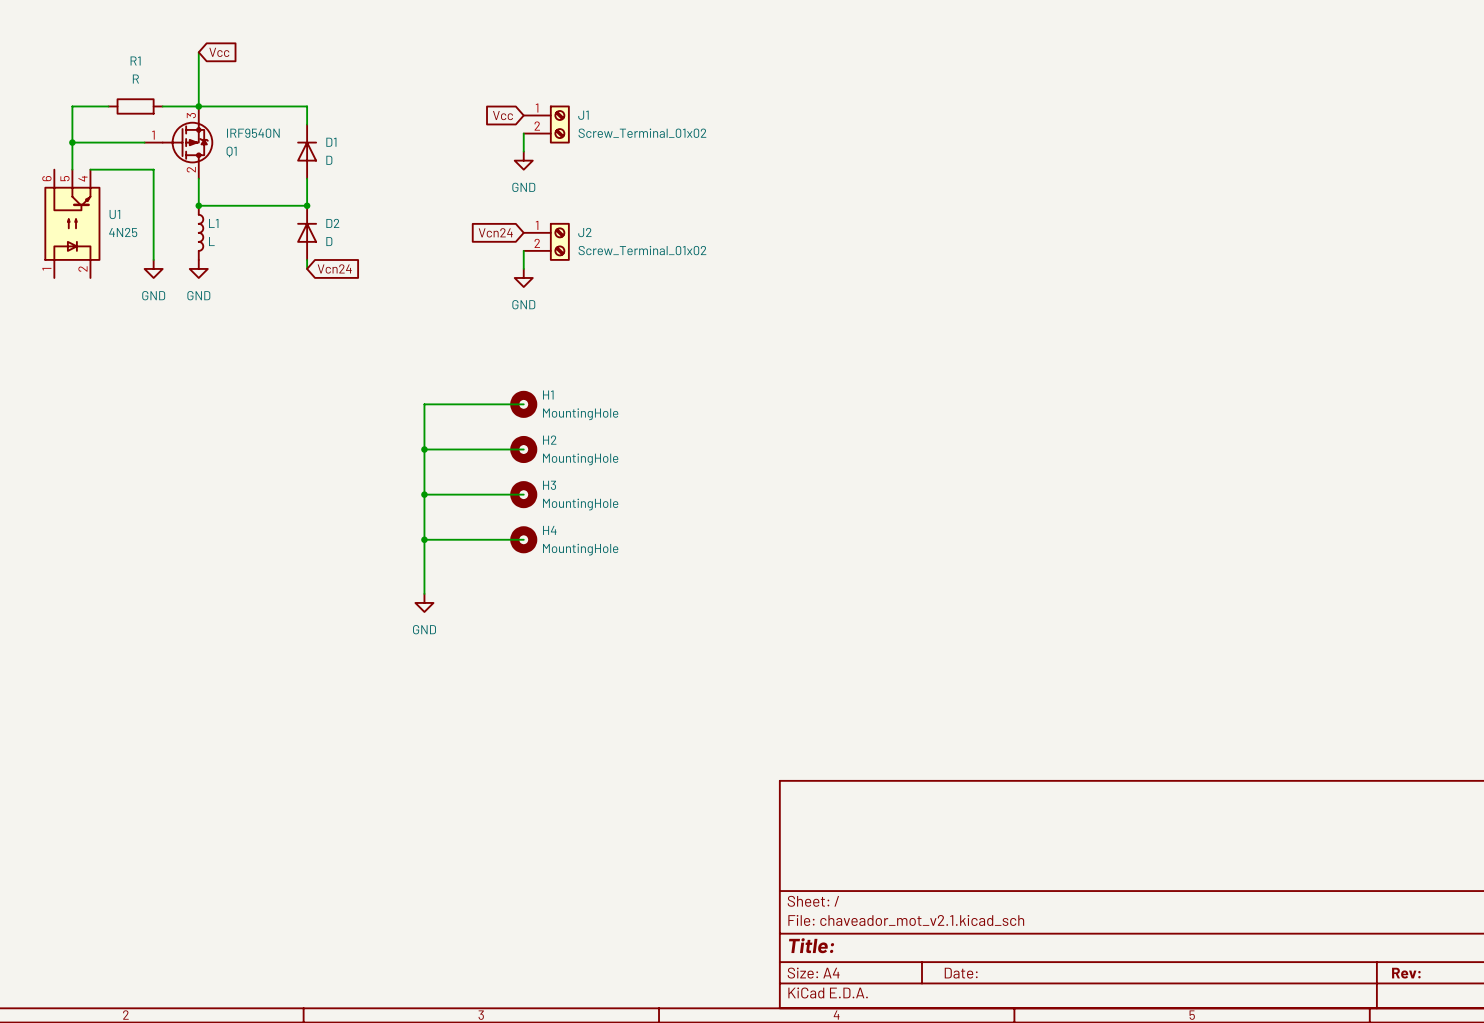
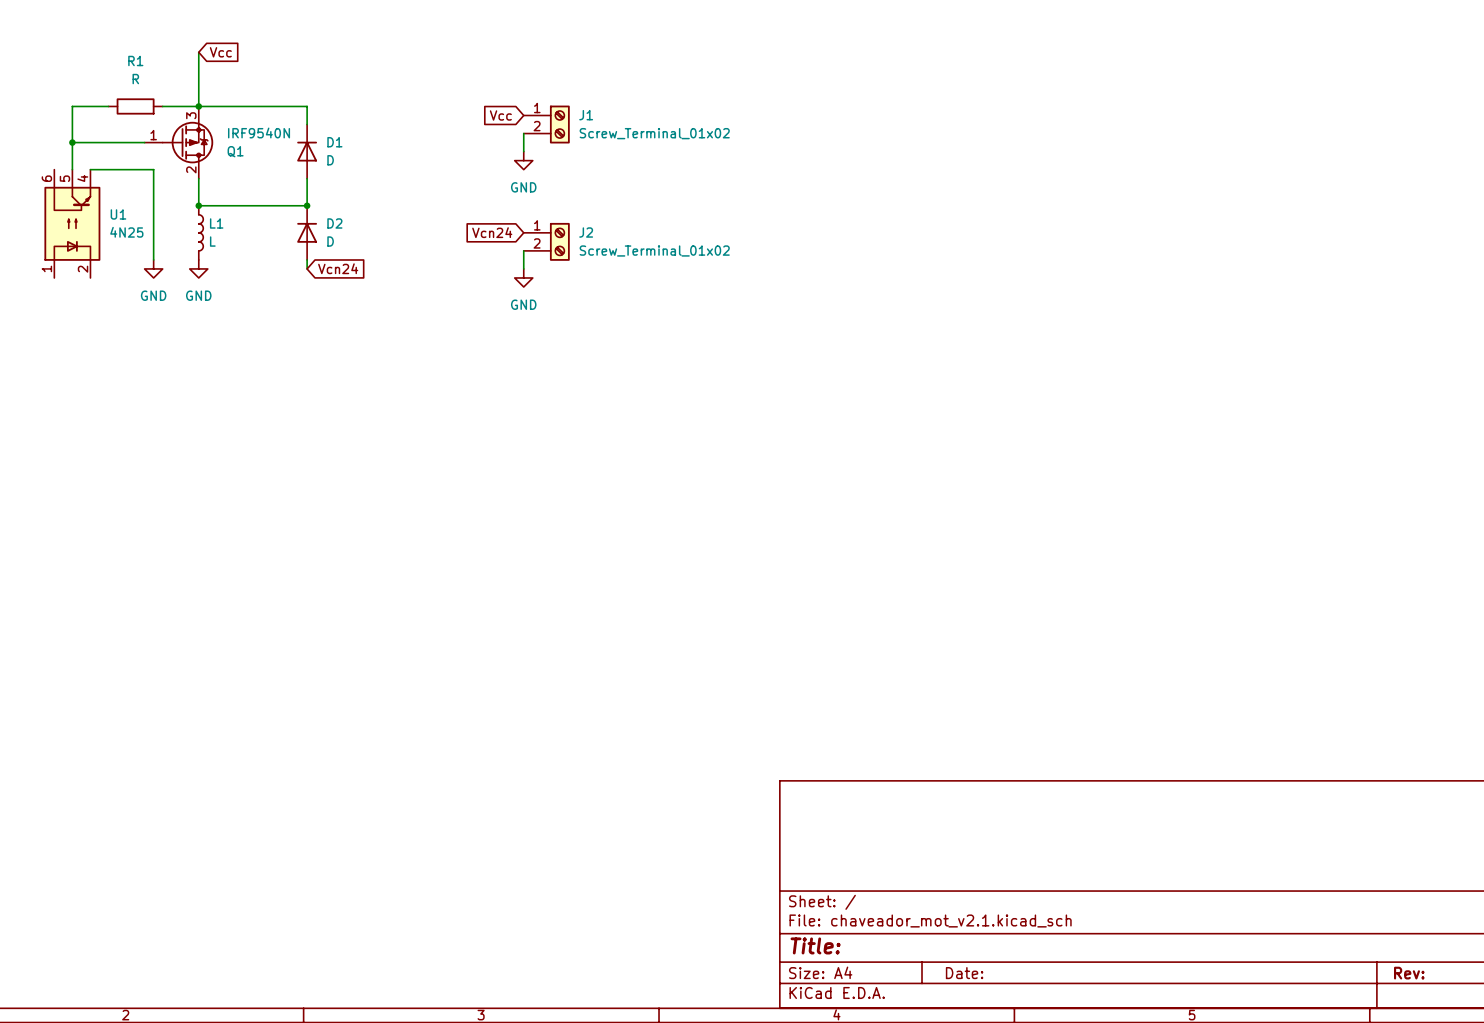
wire: (523, 404) (424, 404) (424, 593) -> none
H1: MountingHole (523, 404) -> none
wire: (424, 449) (523, 449) -> none
junction: (424, 449) -> none
H2: MountingHole (523, 449) -> none
wire: (424, 494) (523, 494) -> none
junction: (424, 494) -> none
H3: MountingHole (523, 494) -> none
wire: (424, 539) (523, 539) -> none
junction: (424, 539) -> none
H4: MountingHole (523, 539) -> none
power symbol: GND (424, 602) -> none

